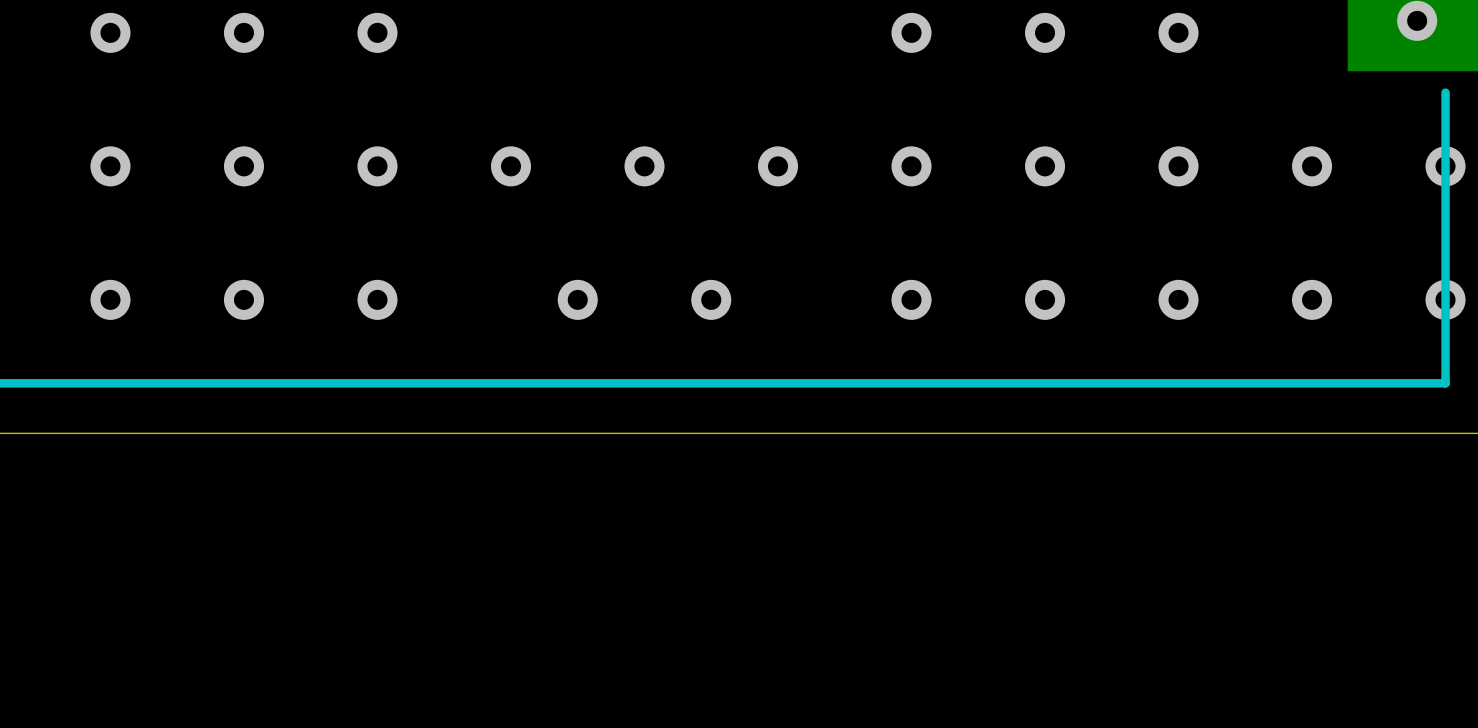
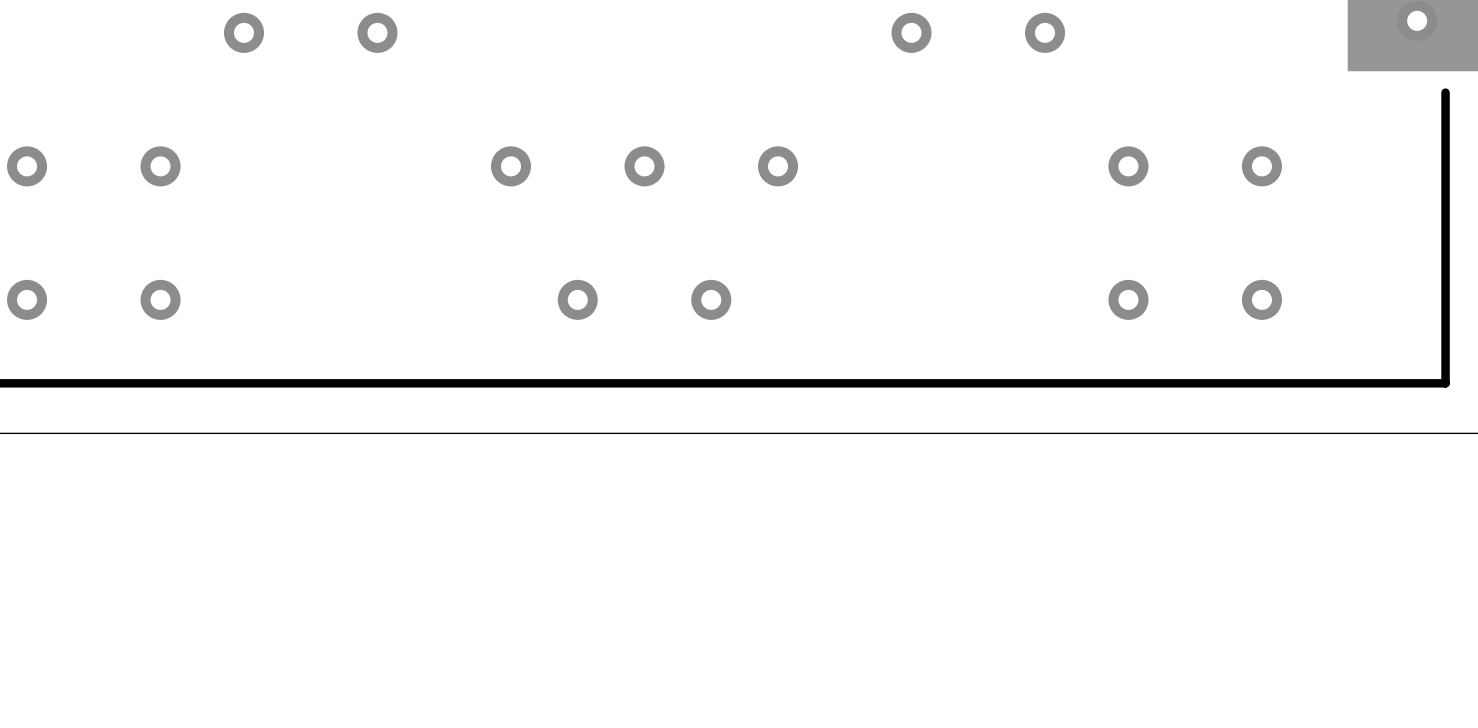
via: (110, 32) -> none
via: (1178, 32) -> none
via: none -> (27, 166)
via: (110, 166) -> none
via: none -> (160, 166)
via: (243, 166) -> none
via: (377, 166) -> none
via: (911, 166) -> none
via: (1045, 166) -> none
via: none -> (1128, 166)
via: (1178, 166) -> none
via: none -> (1261, 166)
via: (1312, 166) -> none
via: (1445, 166) -> none
via: none -> (27, 299)
via: (110, 299) -> none
via: none -> (160, 299)
via: (243, 299) -> none
via: (377, 299) -> none
via: (911, 299) -> none
via: (1045, 299) -> none
via: none -> (1128, 299)
via: (1178, 299) -> none
via: none -> (1261, 299)
via: (1312, 299) -> none
via: (1445, 299) -> none

